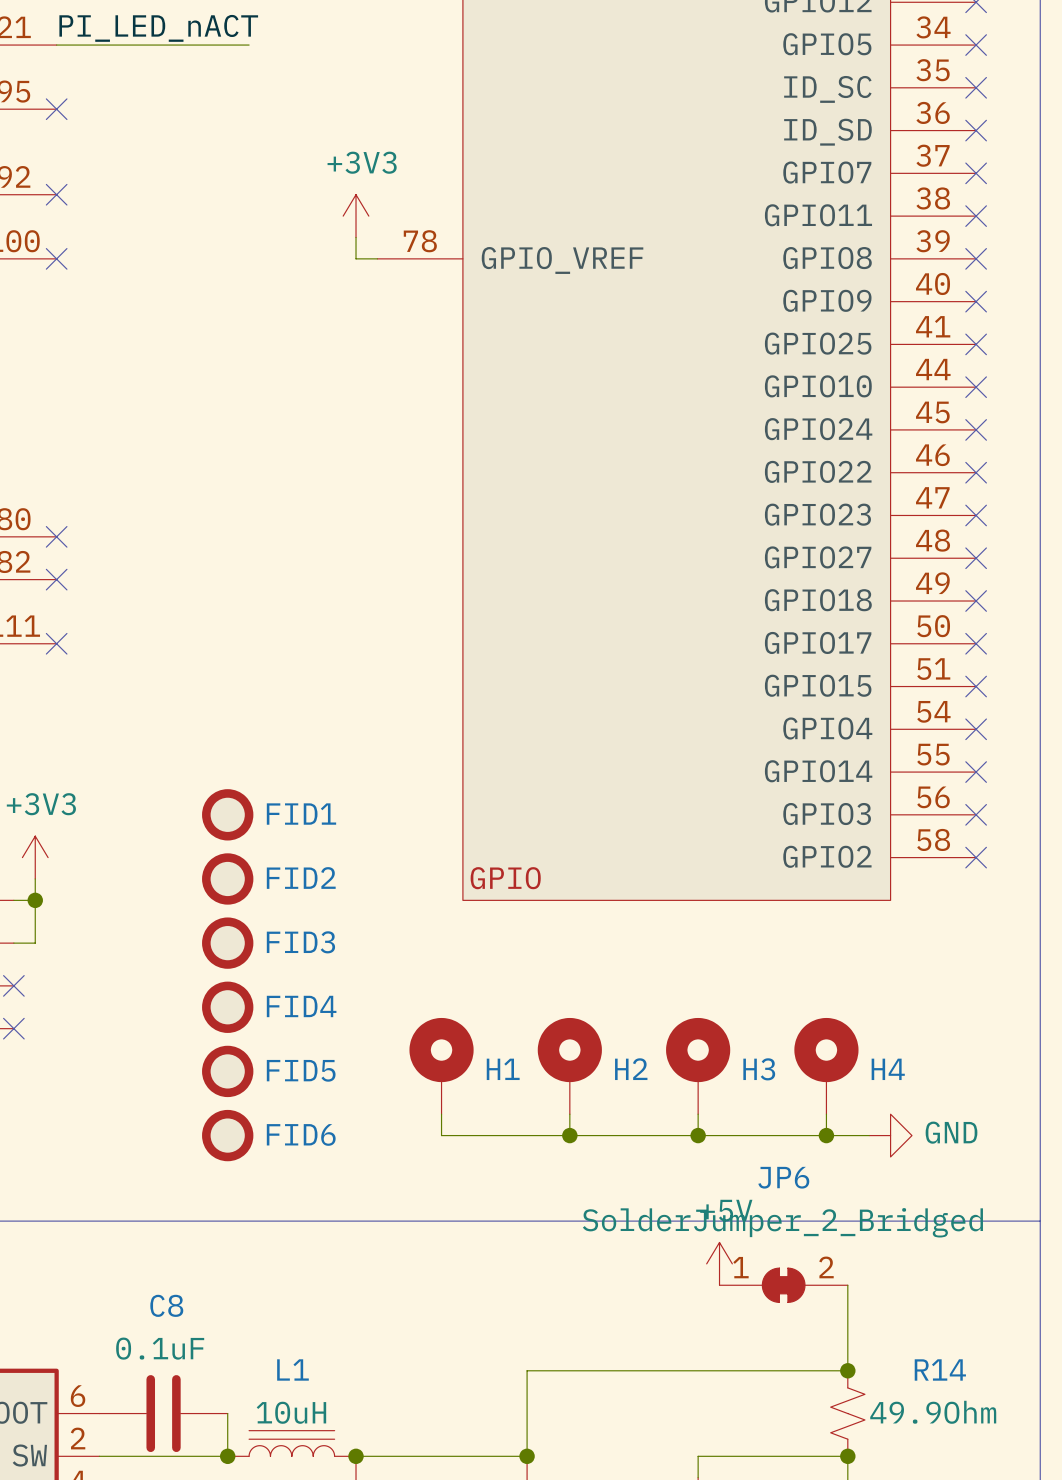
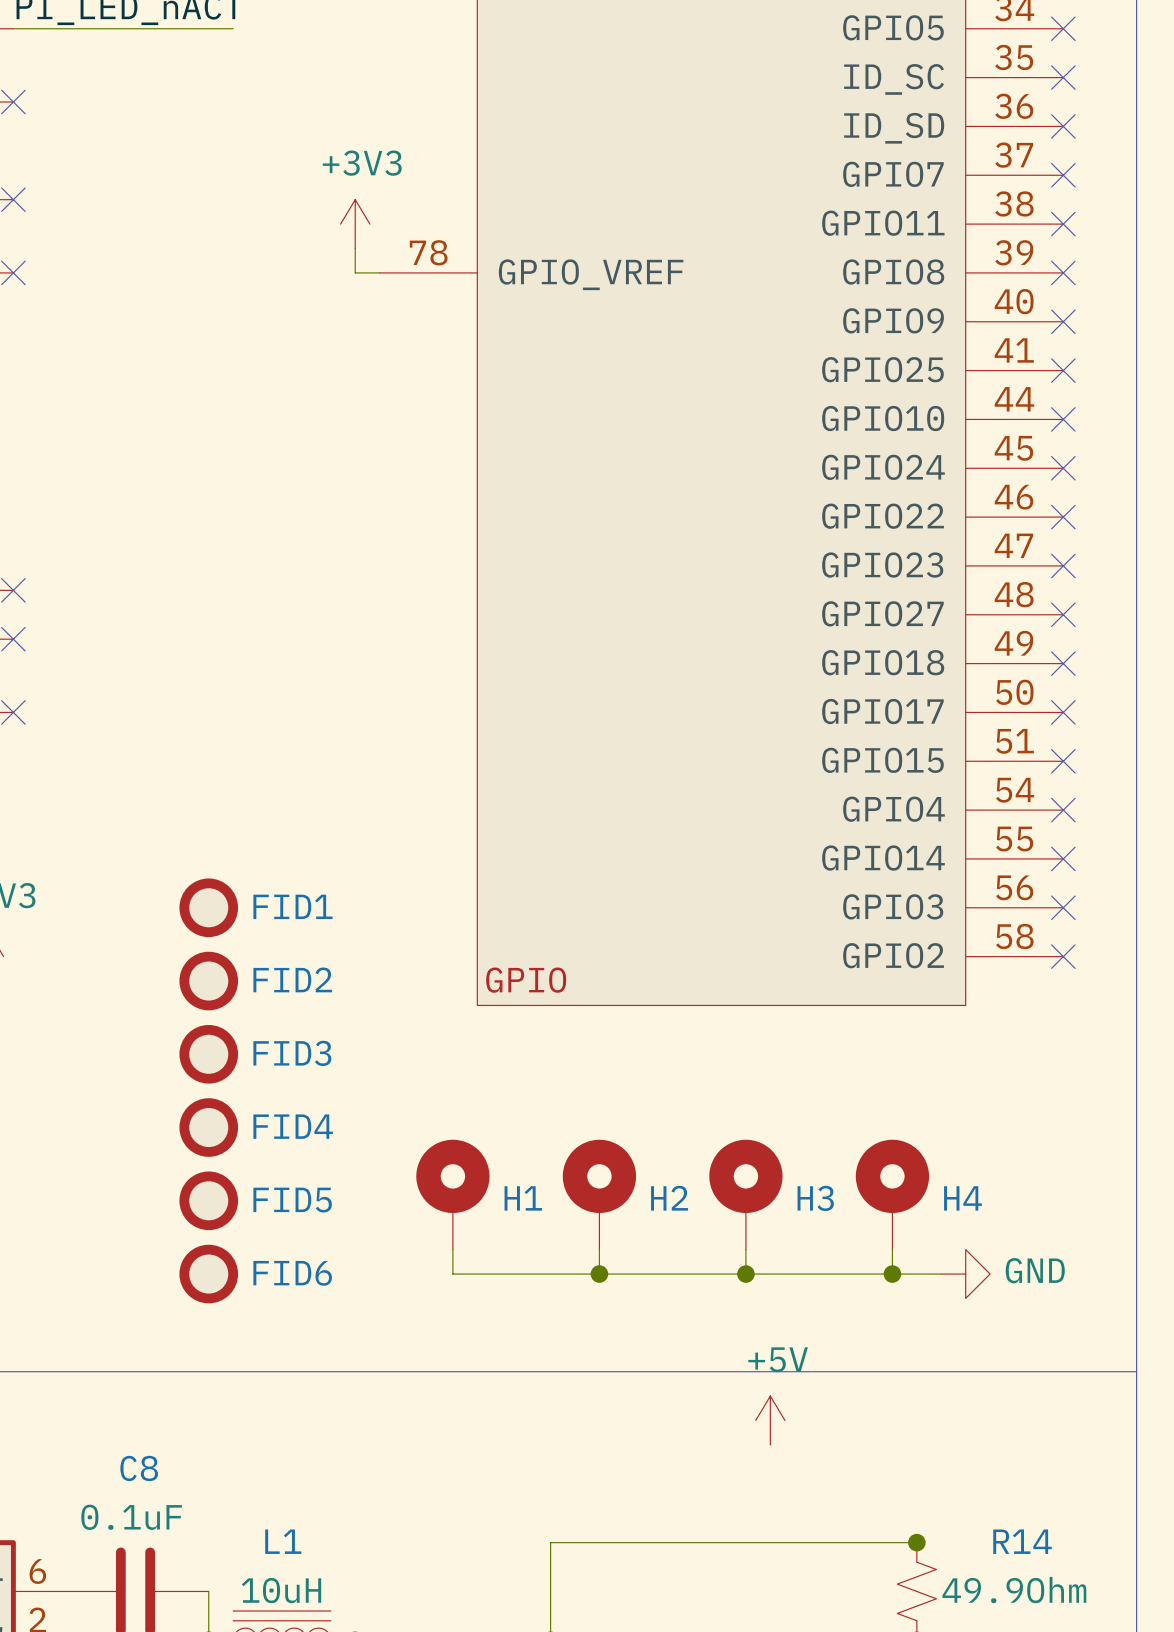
JP6: SolderJumper_2_Bridged (783, 1285) -> none
wire: (847, 1285) (847, 1370) -> none

